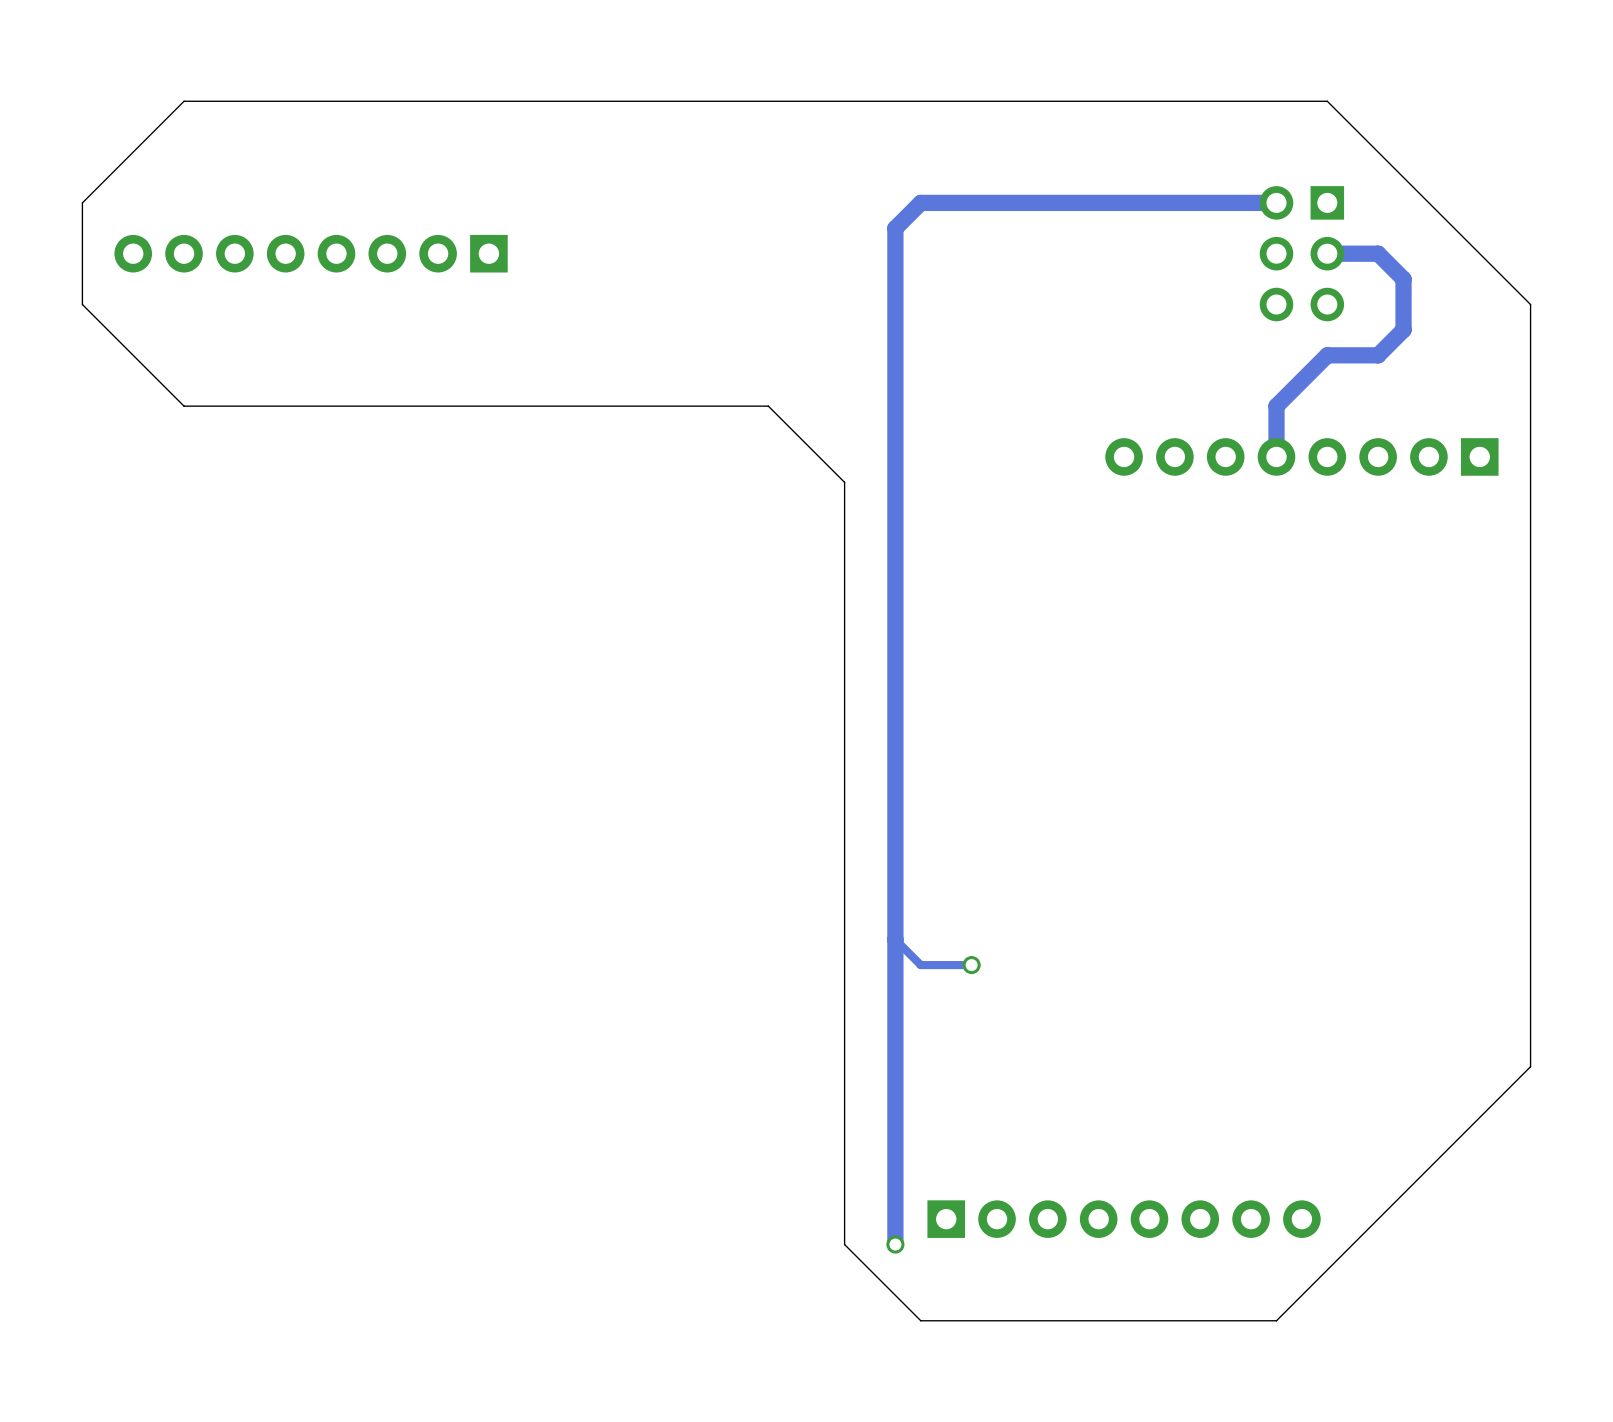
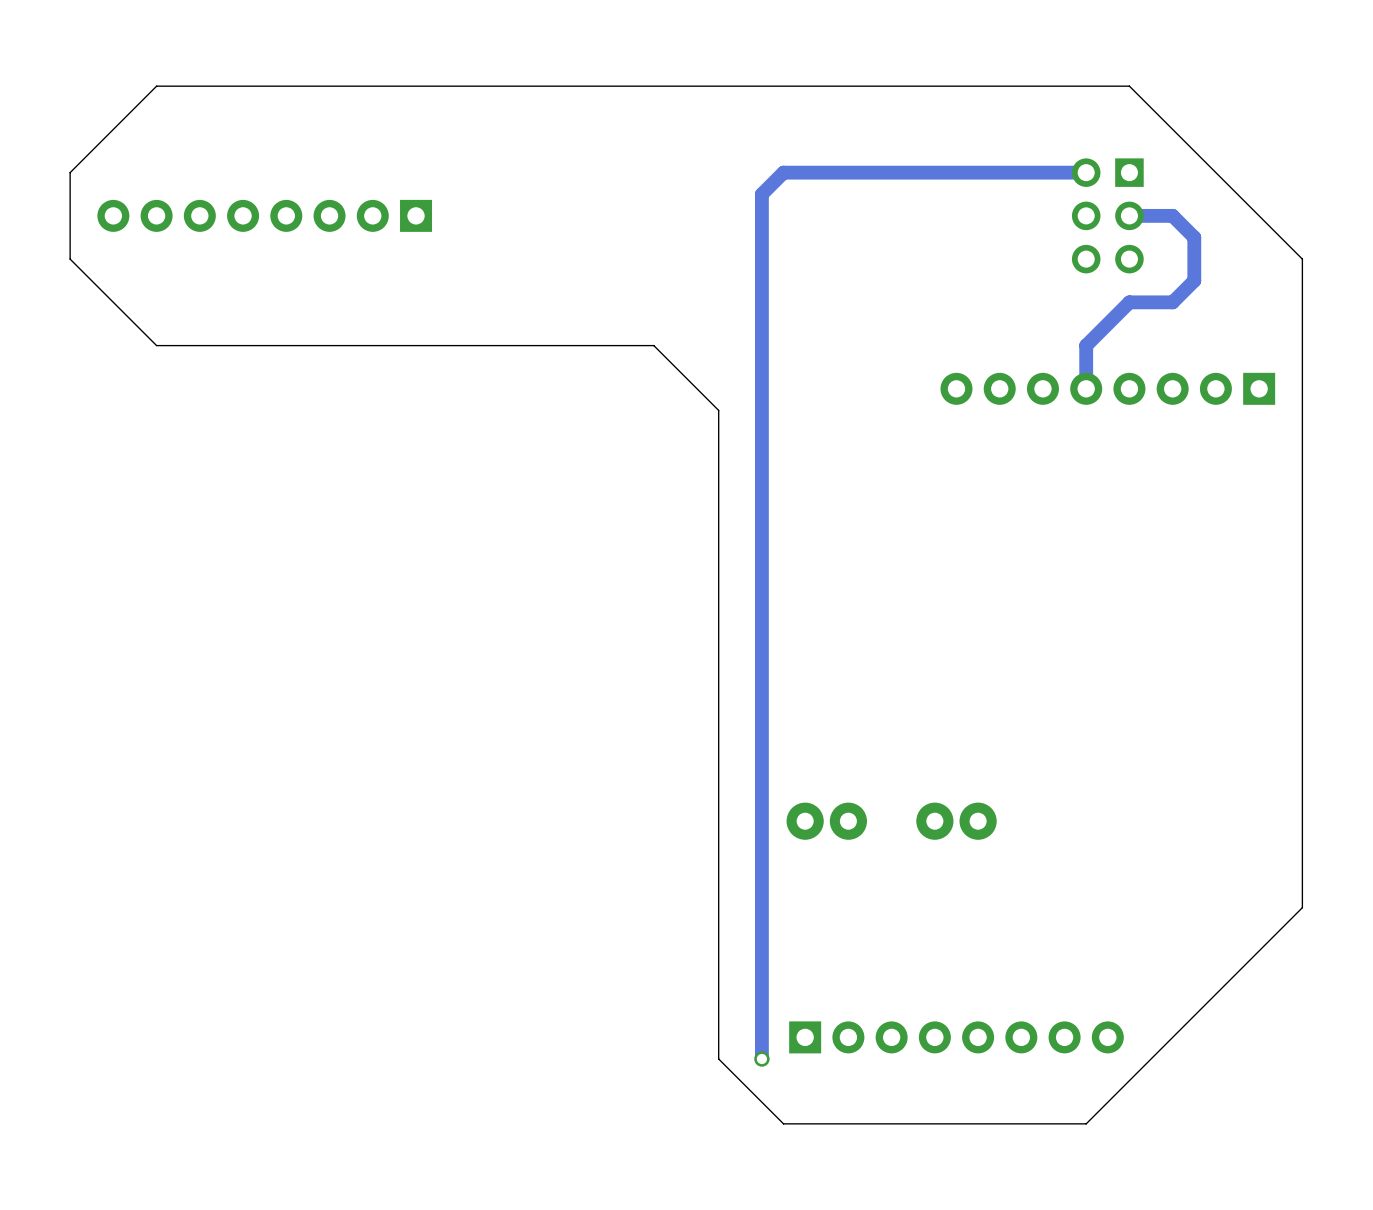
track: (895, 939) (920, 965) (971, 965) -> none
via: none -> (805, 821)
via: (971, 965) -> none
via: none -> (848, 821)
via: none -> (934, 821)
via: none -> (978, 821)

